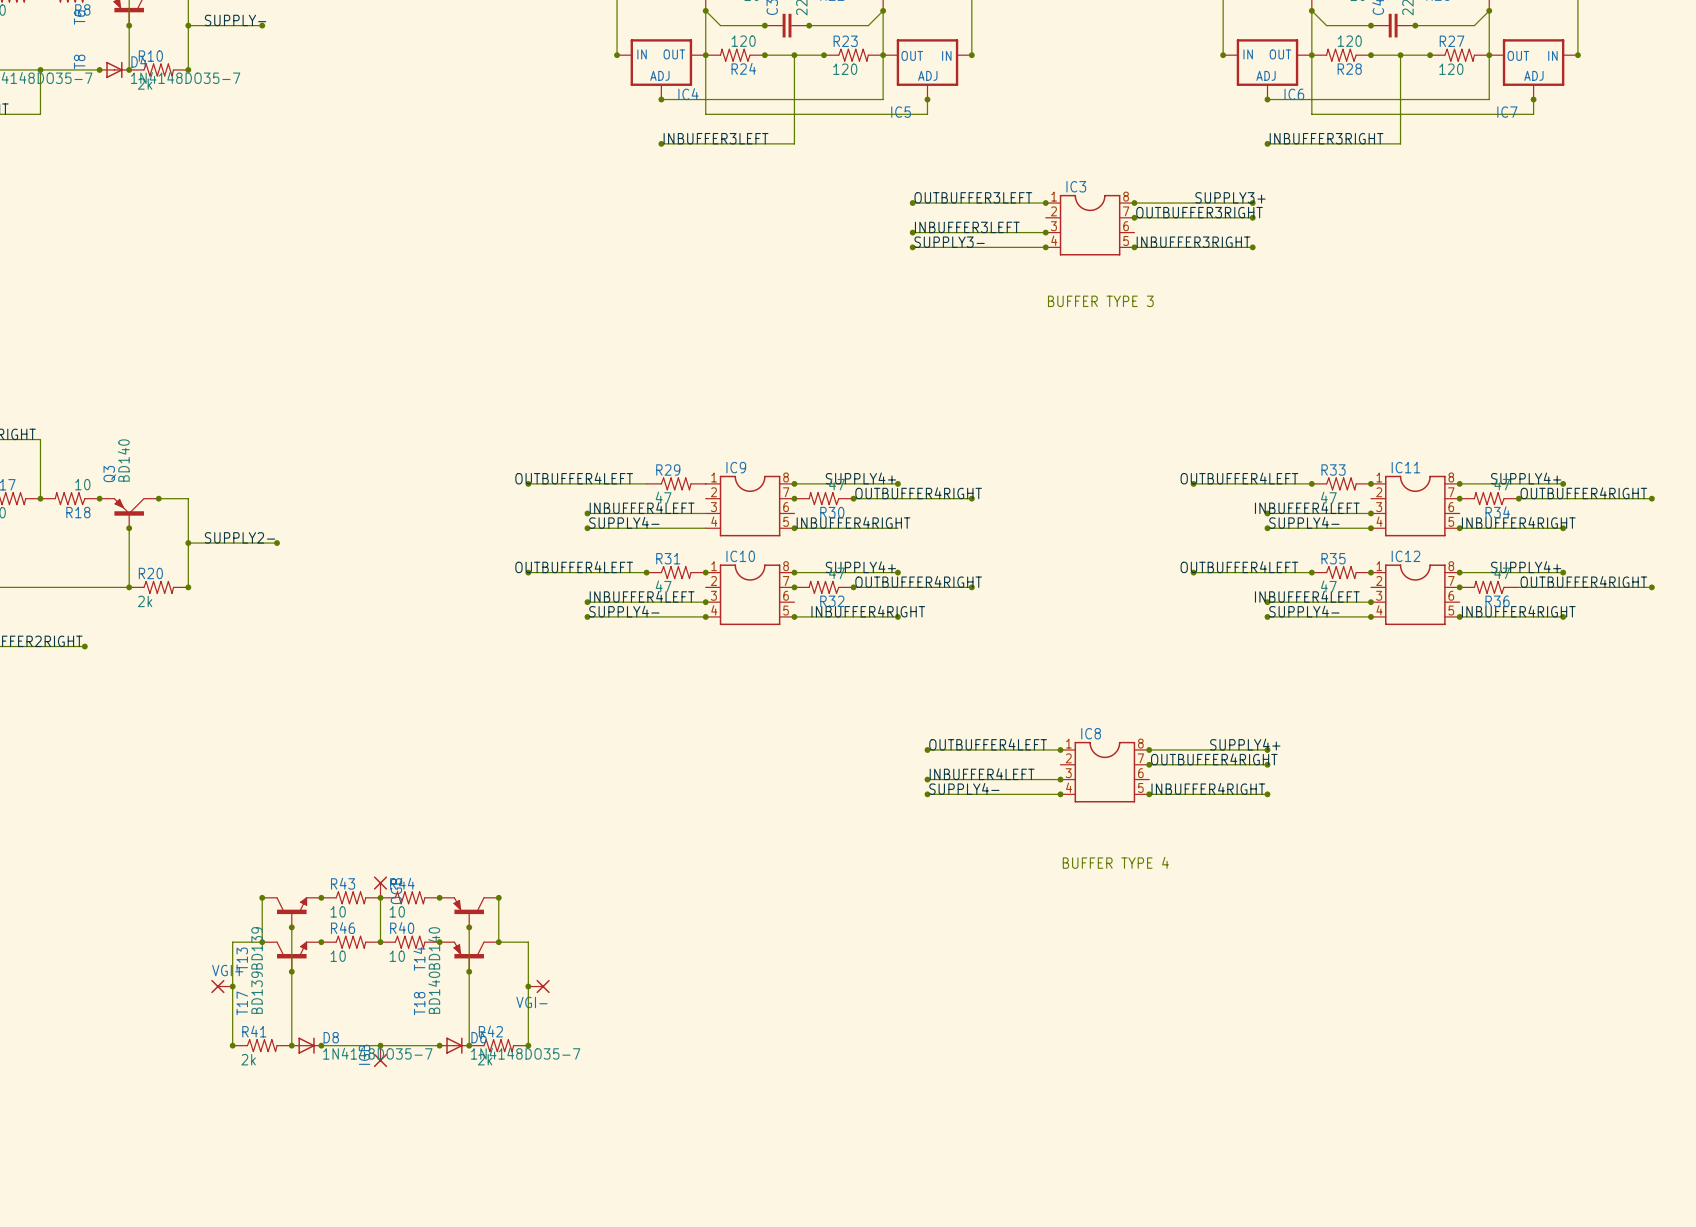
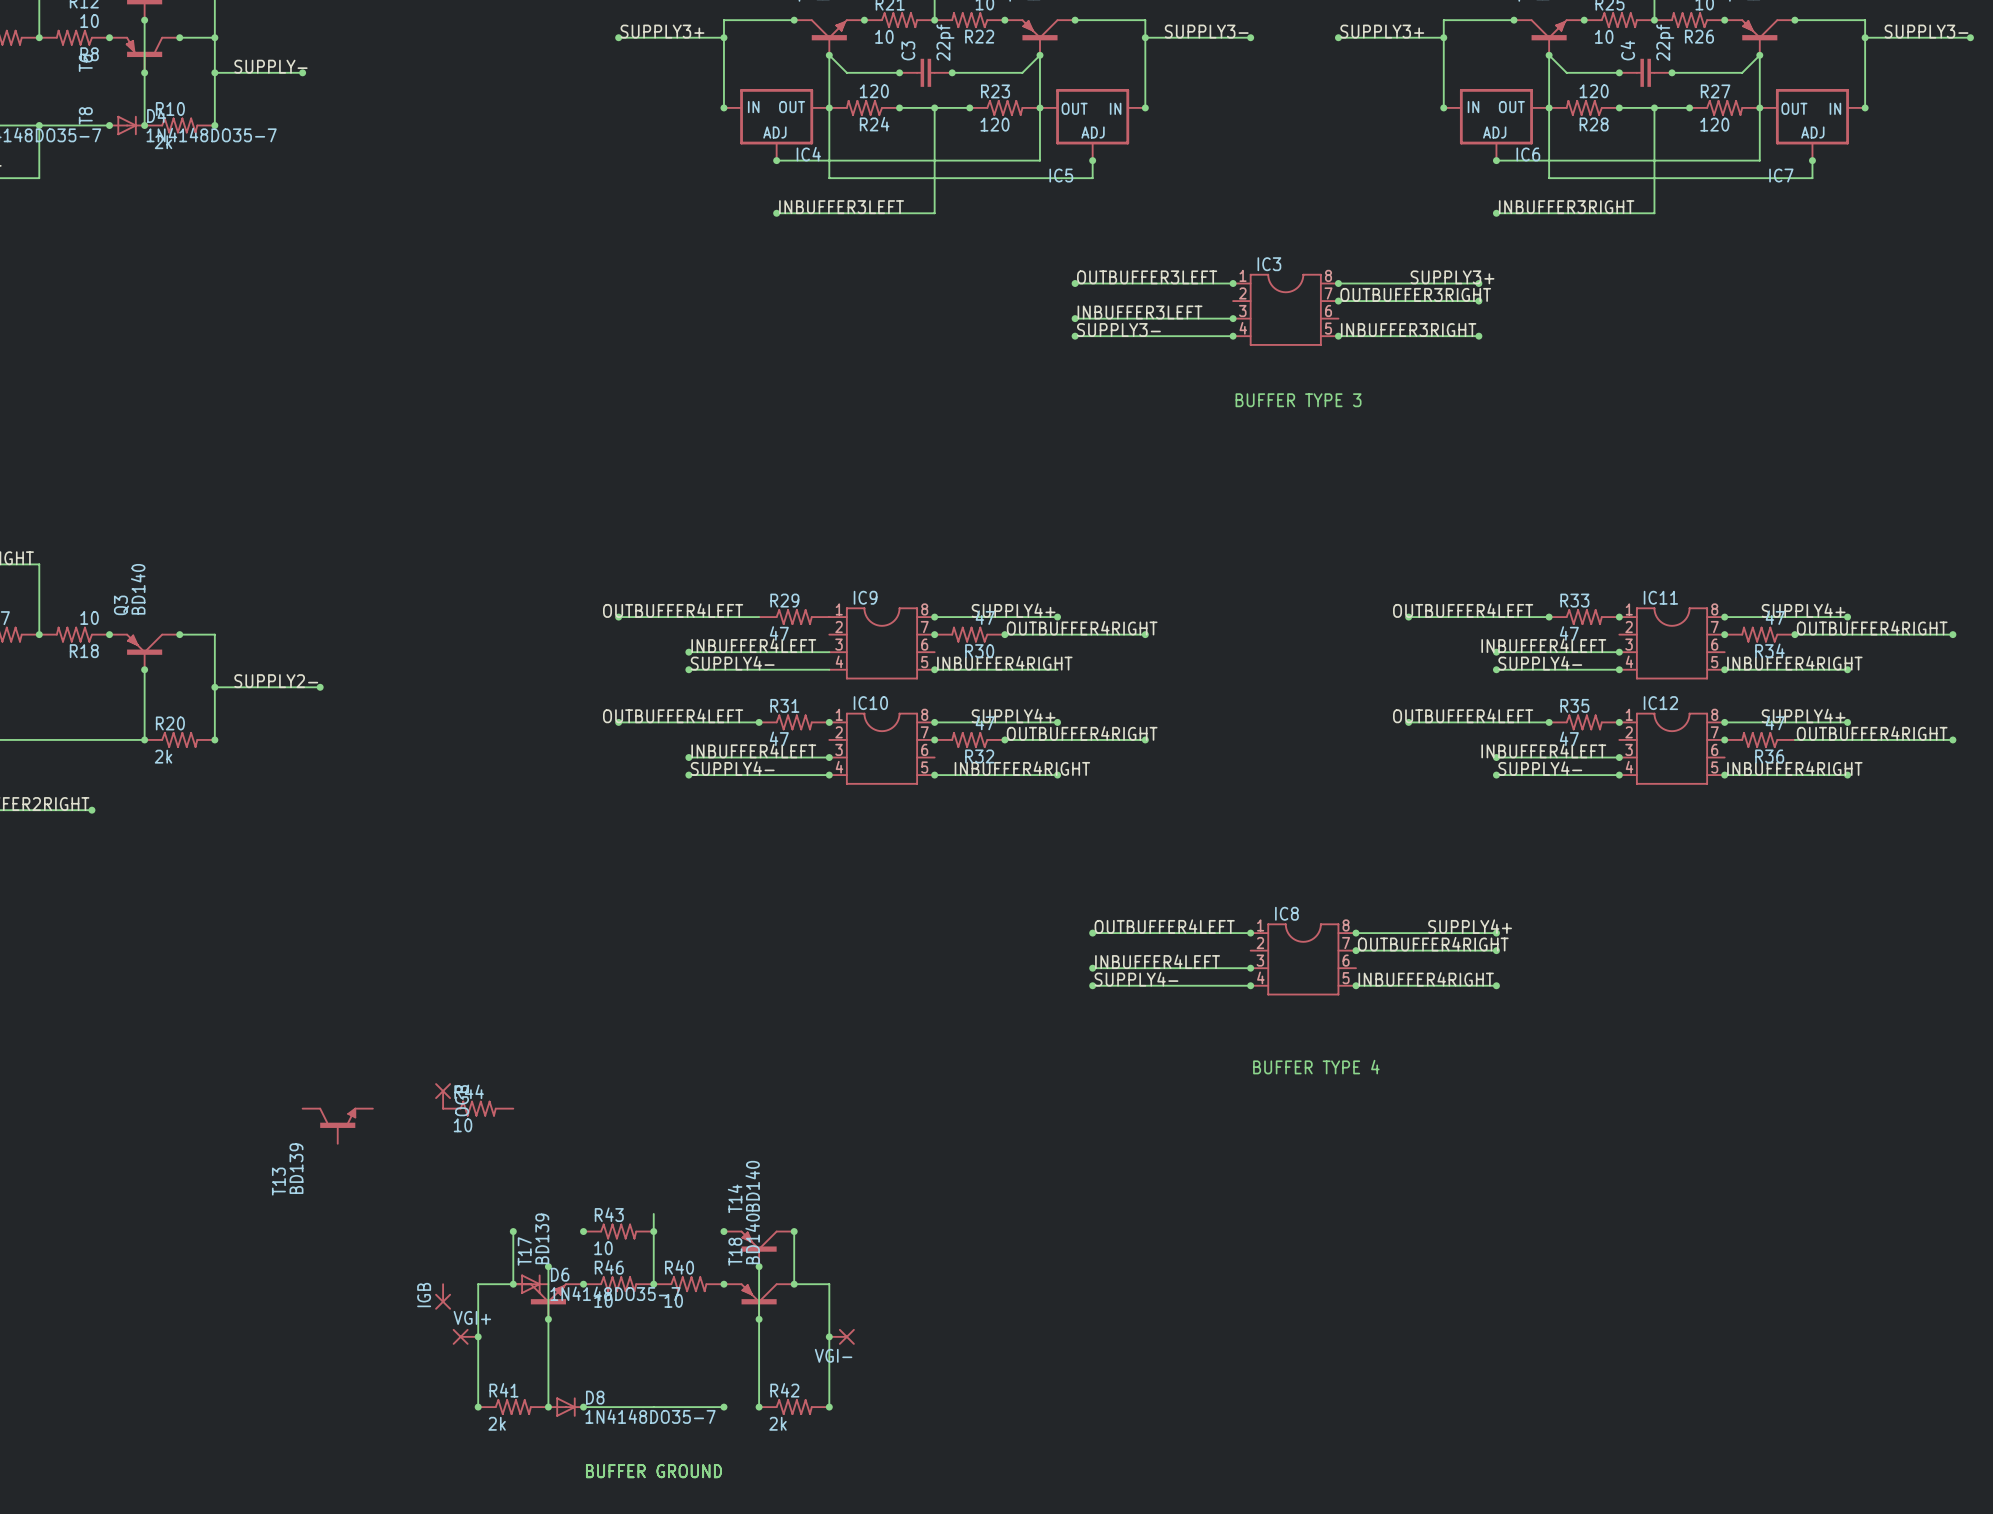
wire: (262, 897) (262, 942) (232, 942) (232, 1045) -> none
junction: (262, 897) -> none
junction: (321, 897) -> none
R43 position: (350, 897) -> (618, 1231)
wire: (380, 897) (380, 942) -> (513, 1231) (513, 1284)
junction: (380, 897) -> none
T14 symbol: [439, 897, 499, 928] -> [723, 1231, 795, 1267]
junction: (439, 897) -> none
wire: (498, 897) (498, 942) (528, 942) (528, 1045) -> none
junction: (498, 897) -> none
wire: (291, 927) (291, 1045) -> none
junction: (291, 927) -> none
wire: (469, 927) (469, 1030) -> (548, 1284) (548, 1407)
junction: (469, 927) -> none
T17 symbol: [262, 941, 322, 972] -> [513, 1283, 584, 1320]
T18 symbol: [439, 941, 499, 972] -> [723, 1283, 795, 1320]
junction: (262, 942) -> none
junction: (321, 942) -> none
R46 position: (350, 942) -> (618, 1284)
junction: (380, 942) -> none
R40 position: (410, 942) -> (688, 1284)
junction: (439, 942) -> none
junction: (498, 942) -> none
T14 value position: BD140 (434, 948) -> BD140 (752, 1186)
T14 name position: T14 (419, 959) -> T14 (735, 1198)
junction: (291, 971) -> none
junction: (469, 971) -> none
VGI+: (221, 986) -> none
junction: (232, 986) -> none
junction: (528, 986) -> none
VGI-: (539, 986) -> none
wire: none -> (653, 1213) (653, 1284)
T17 value position: BD139 (257, 992) -> BD139 (542, 1238)
T18 value position: BD140 (434, 992) -> BD140 (752, 1238)
junction: none -> (513, 1231)
junction: none -> (583, 1231)
junction: none -> (653, 1231)
junction: none -> (723, 1231)
wire: none -> (794, 1231) (794, 1284) (829, 1284) (829, 1407)
junction: none -> (794, 1231)
T17 name position: T17 (242, 1003) -> T17 (524, 1251)
T18 name position: T18 (419, 1003) -> T18 (735, 1251)
junction: none -> (548, 1266)
wire: none -> (759, 1266) (759, 1407)
junction: none -> (759, 1266)
junction: (232, 1045) -> none
R41 position: (262, 1045) -> (513, 1407)
junction: (291, 1045) -> none
D8 position: (306, 1045) -> (565, 1407)
wire: (321, 1045) (410, 1045) -> (478, 1407) (478, 1284)
junction: (321, 1045) -> none
junction: (380, 1045) -> none
junction: (469, 1045) -> none
R42 position: (498, 1045) -> (794, 1407)
junction: none -> (583, 1284)
junction: (528, 1045) -> none
junction: none -> (653, 1284)
junction: none -> (723, 1284)
junction: none -> (794, 1284)
junction: none -> (548, 1319)
junction: none -> (759, 1319)
VGI+: none -> (465, 1336)
junction: none -> (478, 1336)
junction: none -> (829, 1336)
VGI-: none -> (842, 1336)
junction: none -> (478, 1407)
junction: none -> (548, 1407)
wire: none -> (583, 1407) (723, 1407)
junction: none -> (583, 1407)
junction: none -> (723, 1407)
junction: none -> (759, 1407)
junction: none -> (829, 1407)
text: none -> BUFFER GROUND (653, 1471)

